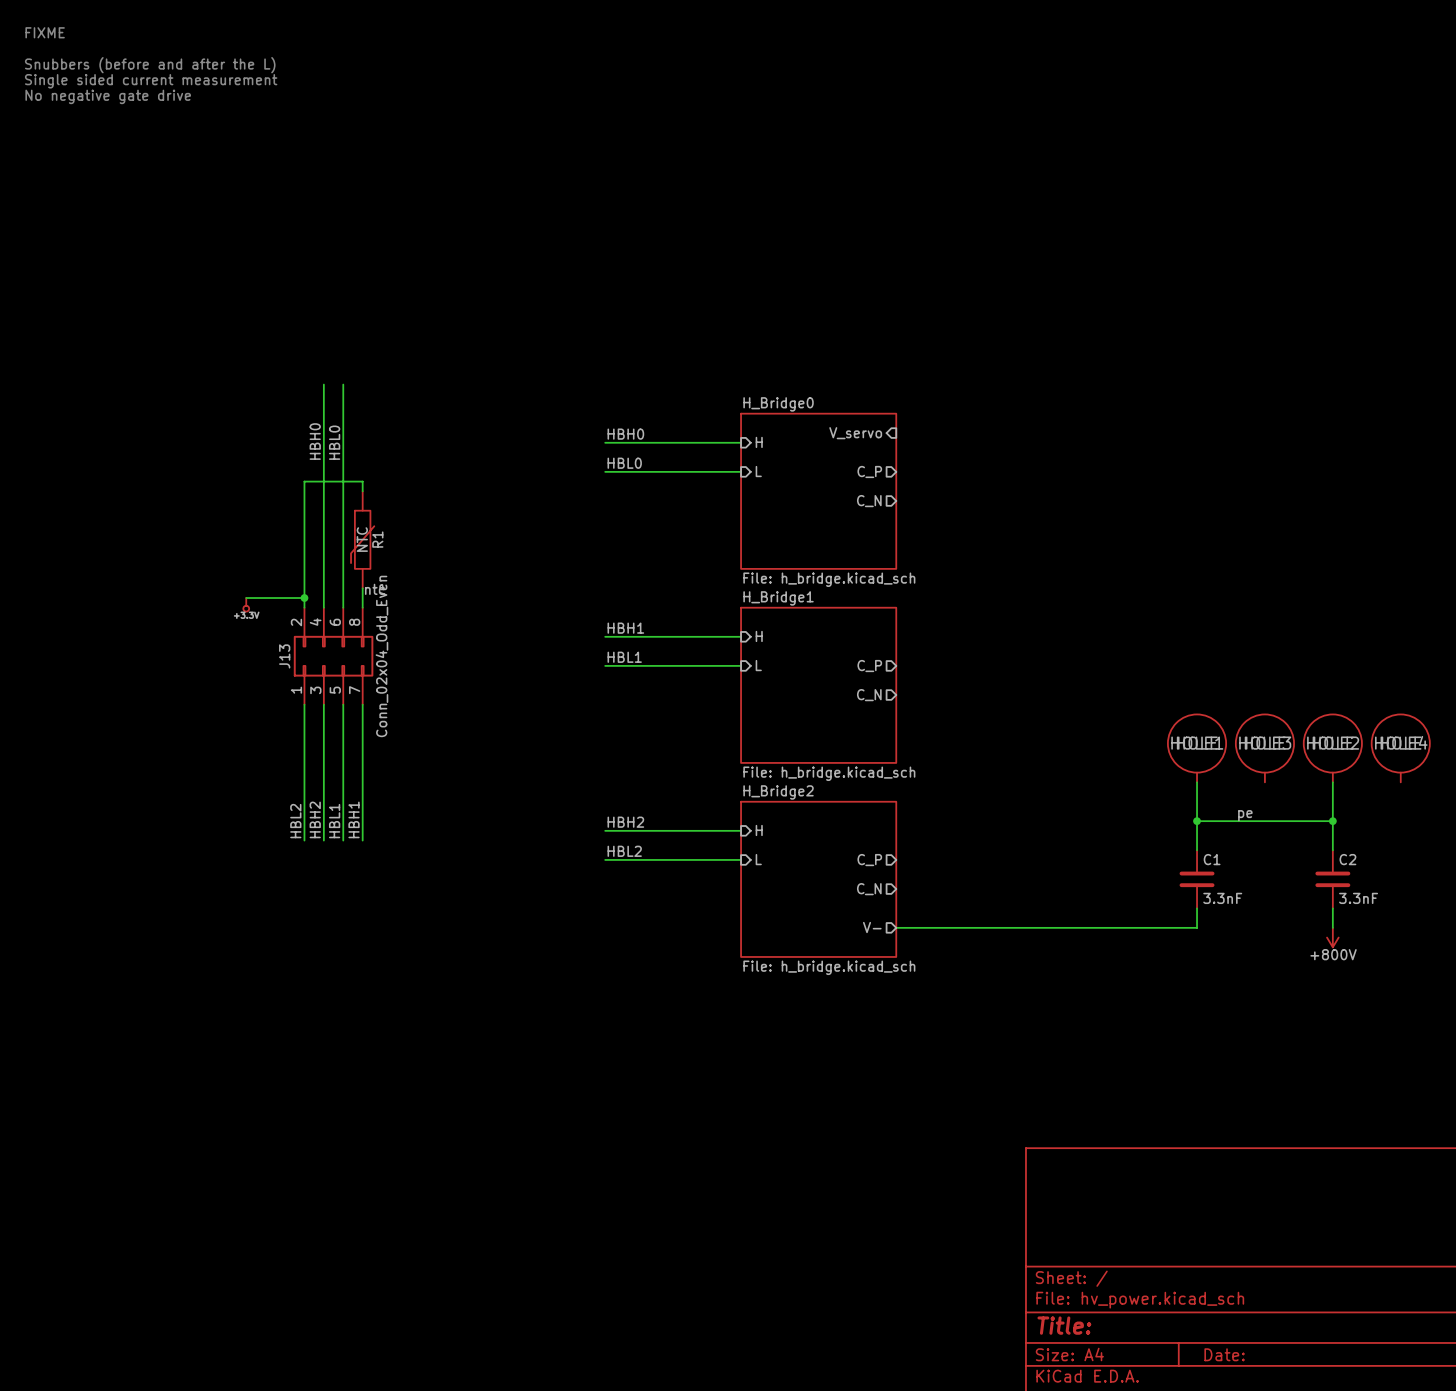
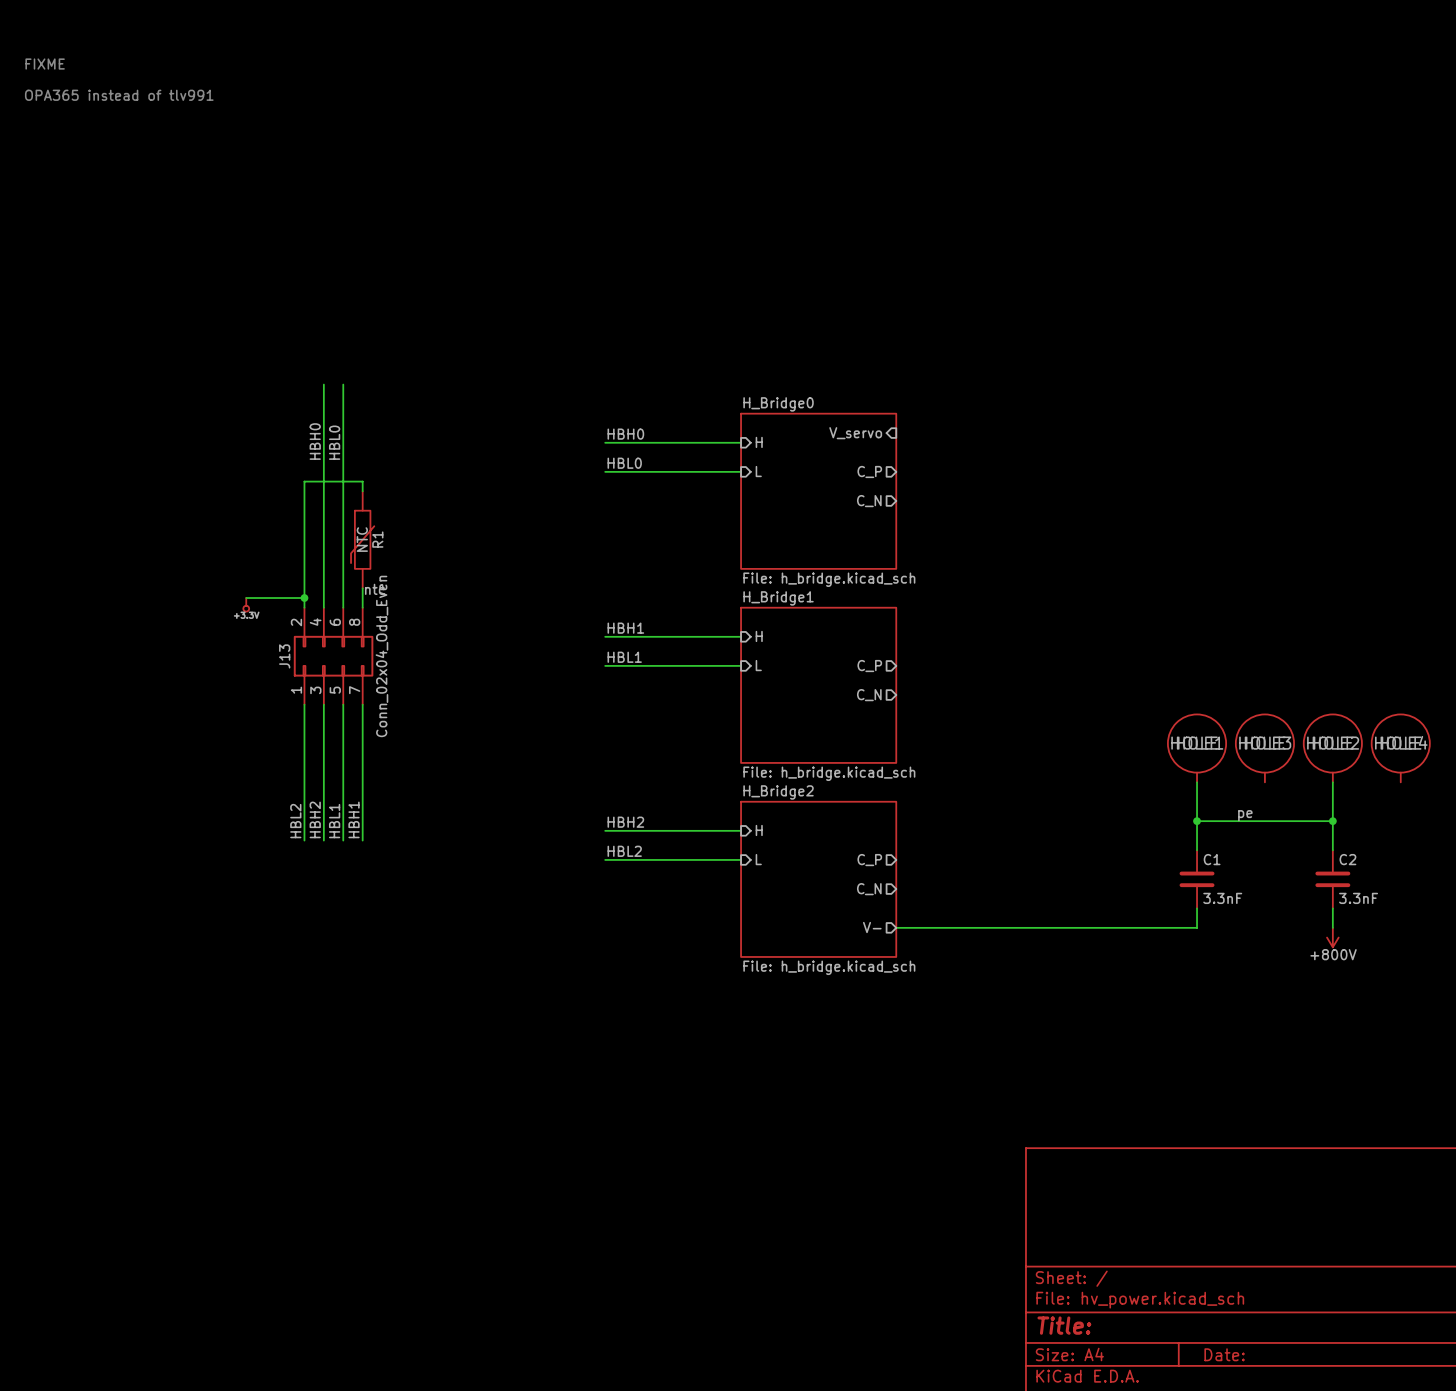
text: FIXME (45, 32) -> none
text: Snubbers (before and after the L) (150, 65) -> FIXME (45, 64)
text: Single sided current measurement (151, 81) -> none
text: No negative gate drive (108, 96) -> OPA365 instead of tlv991 (119, 95)

